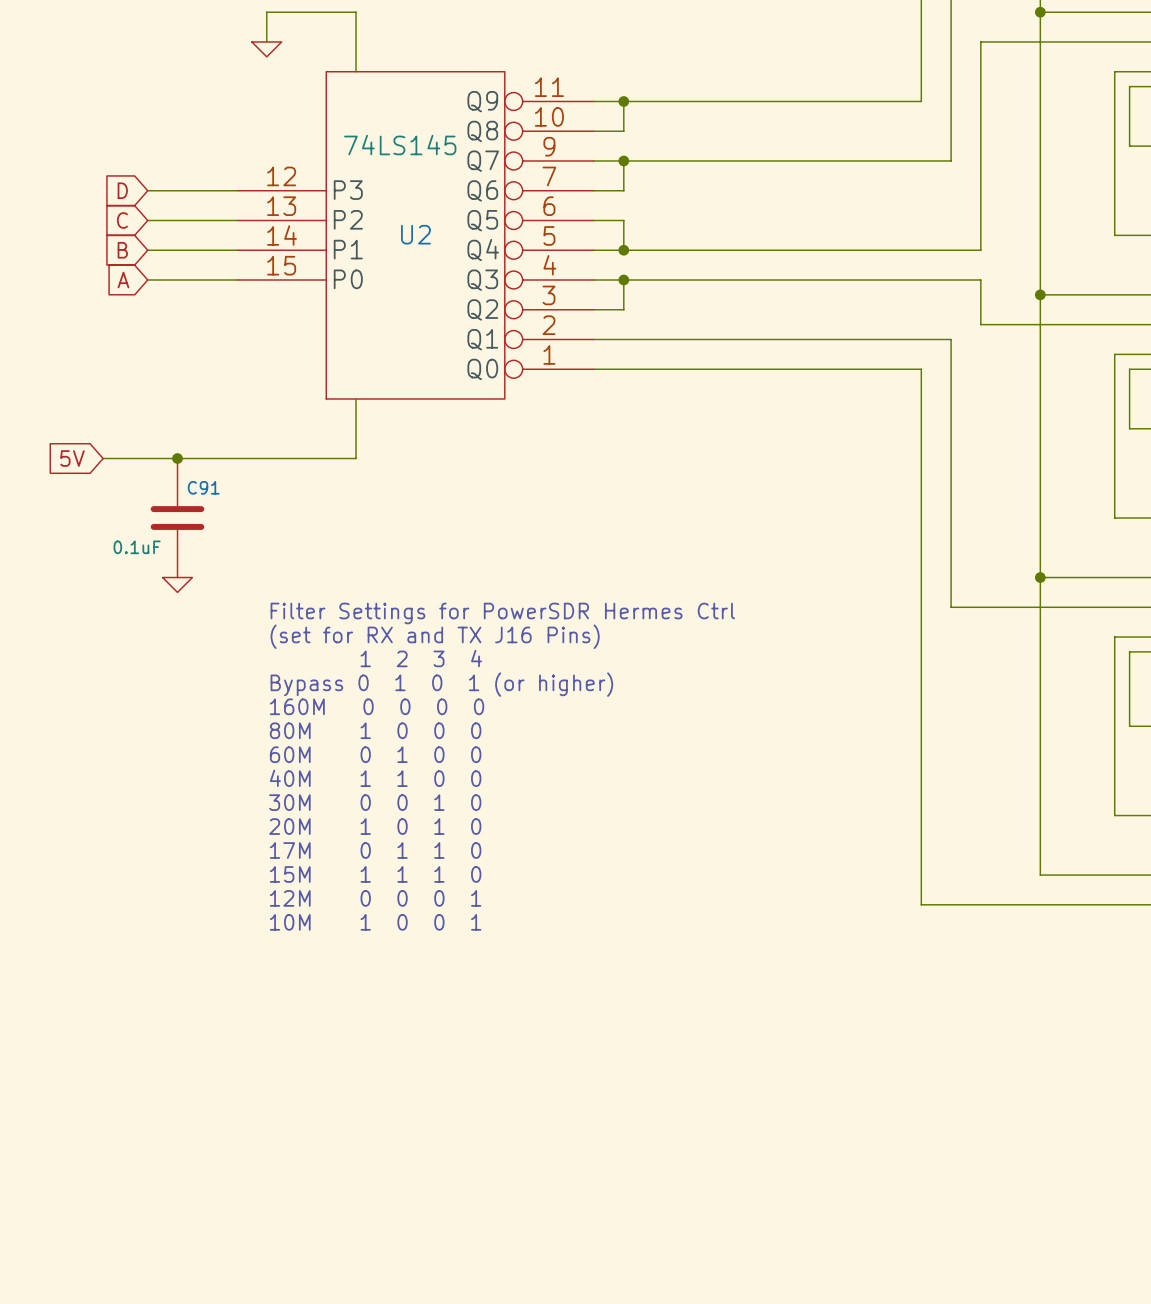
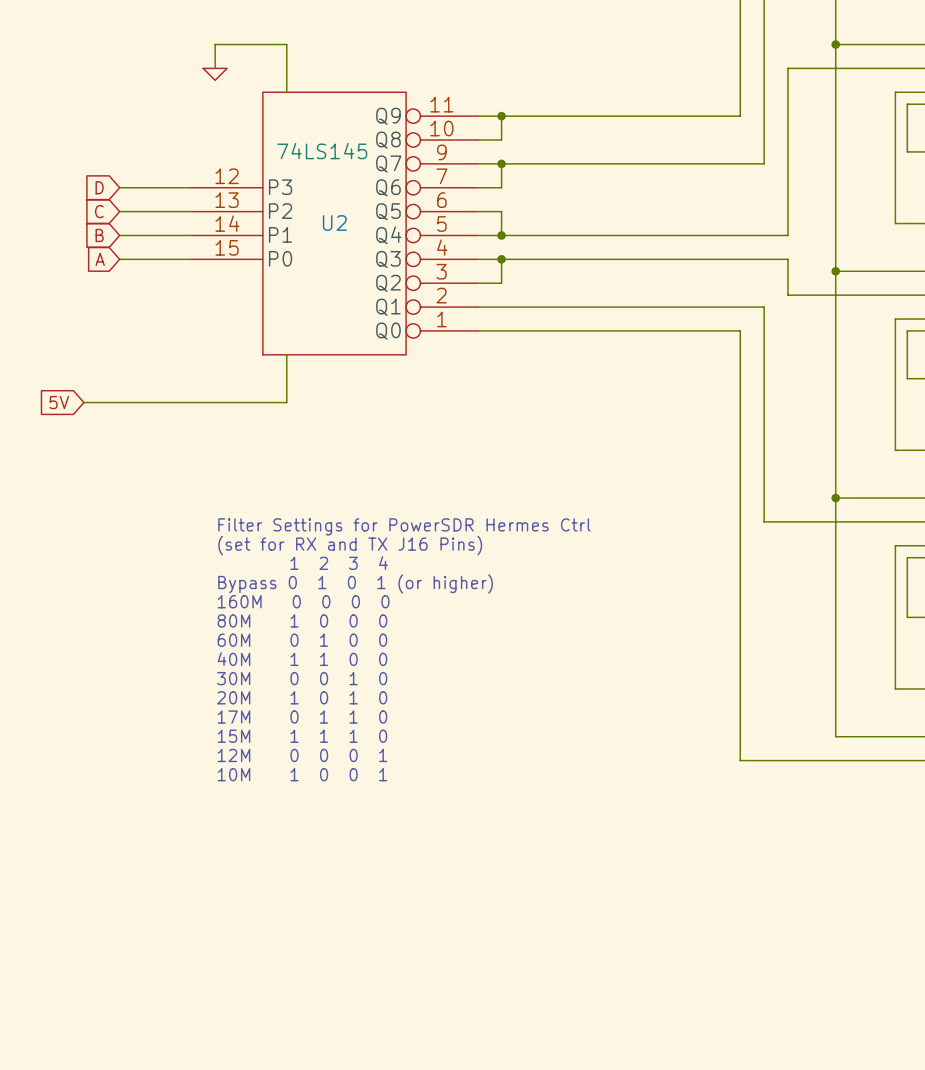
junction: (177, 458) -> none
C91: 0.1uF (177, 518) -> none
power symbol: (177, 584) -> none

